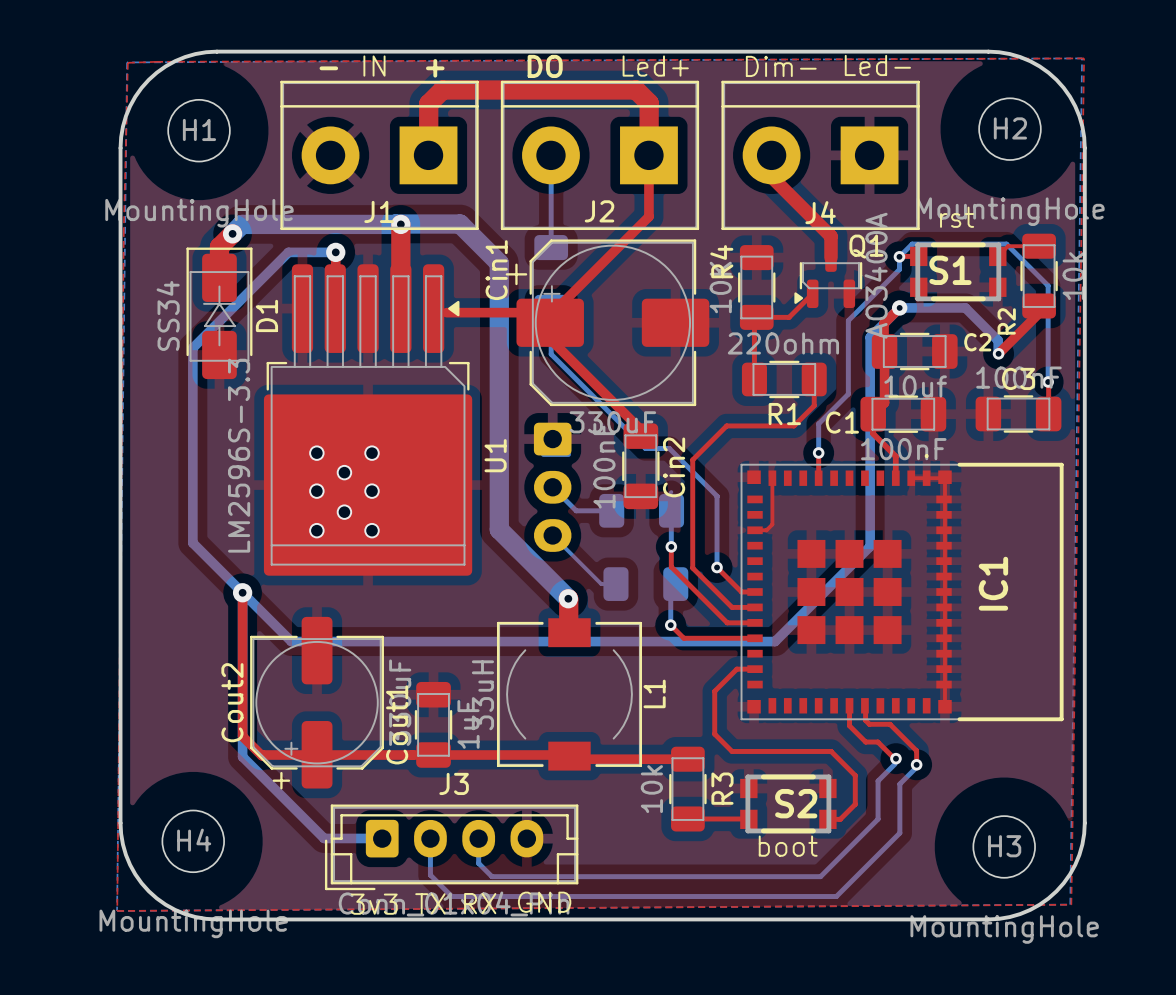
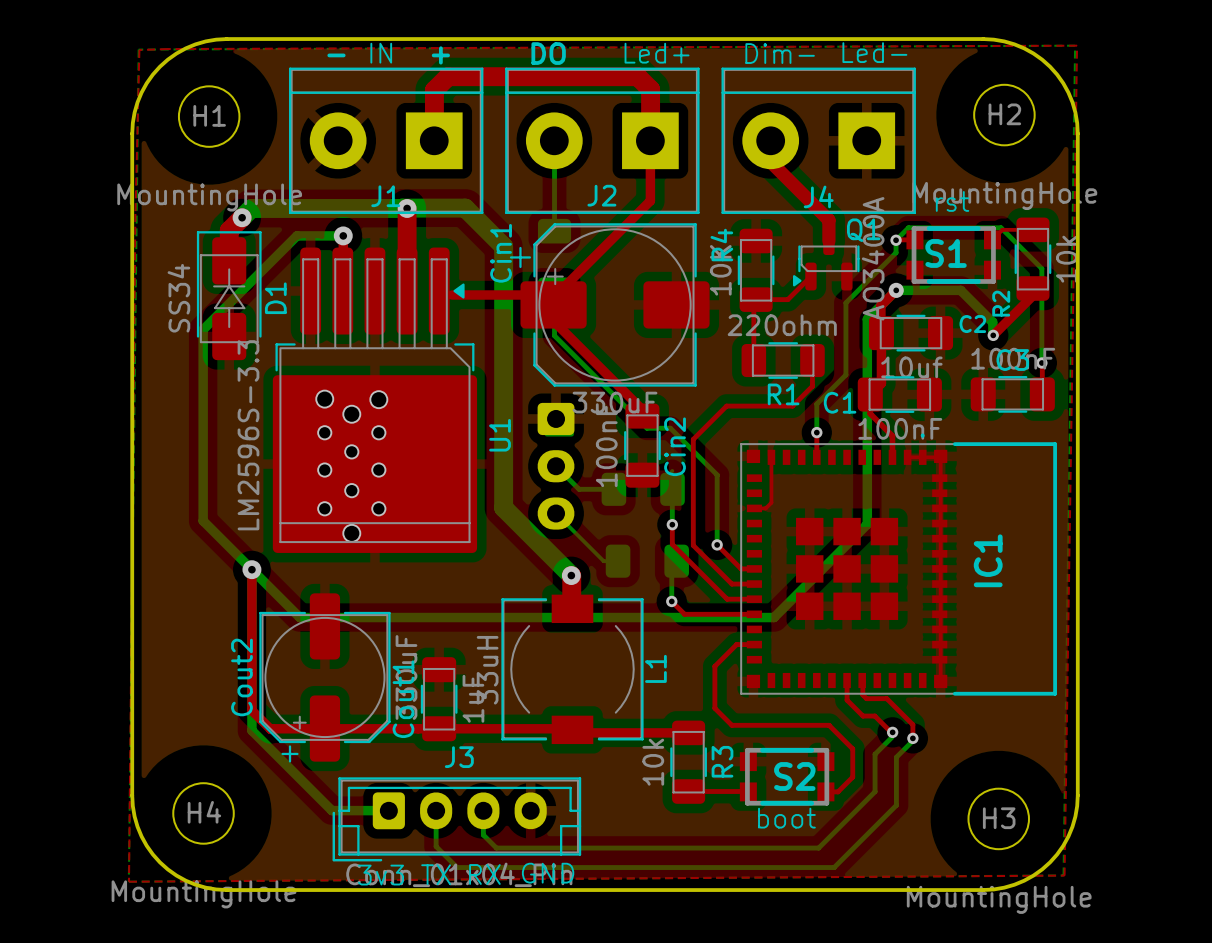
via: none -> (324, 399)
via: none -> (378, 399)
via: none -> (351, 414)
via: none -> (351, 533)

